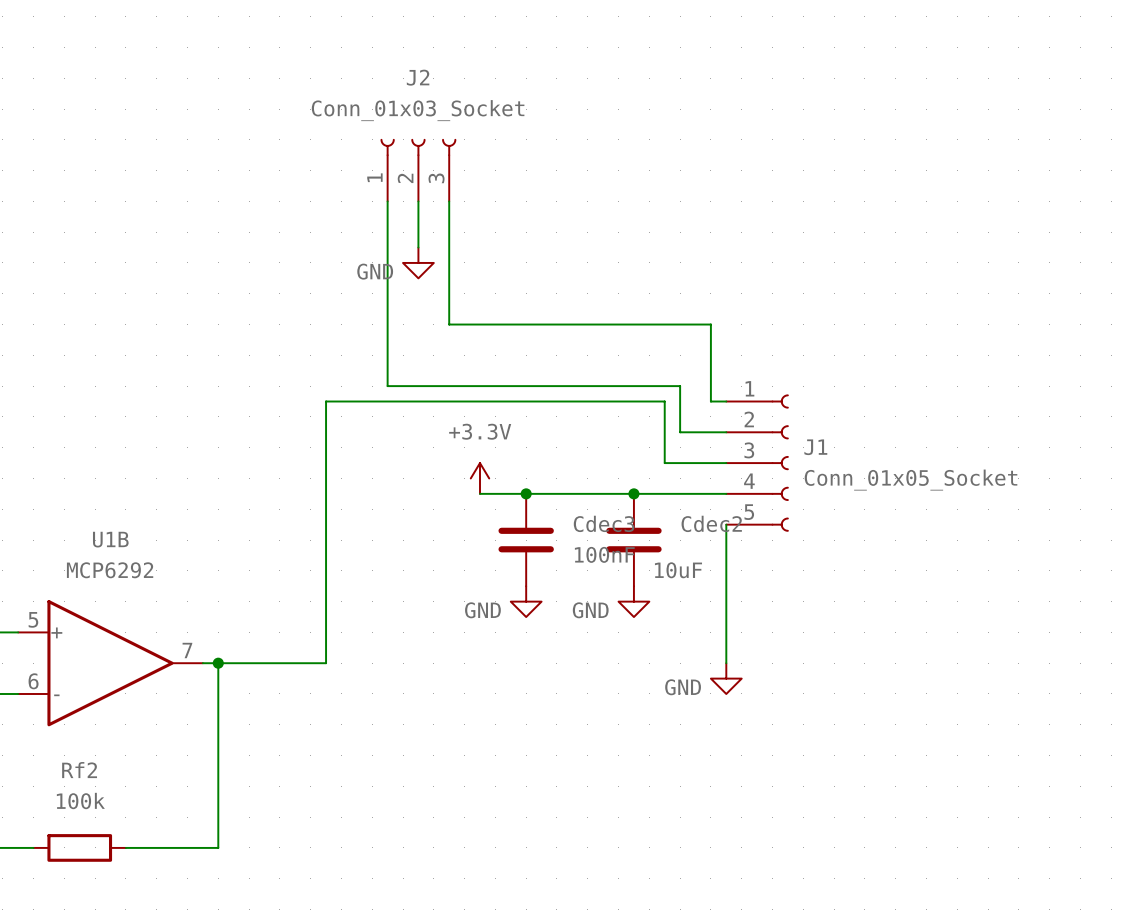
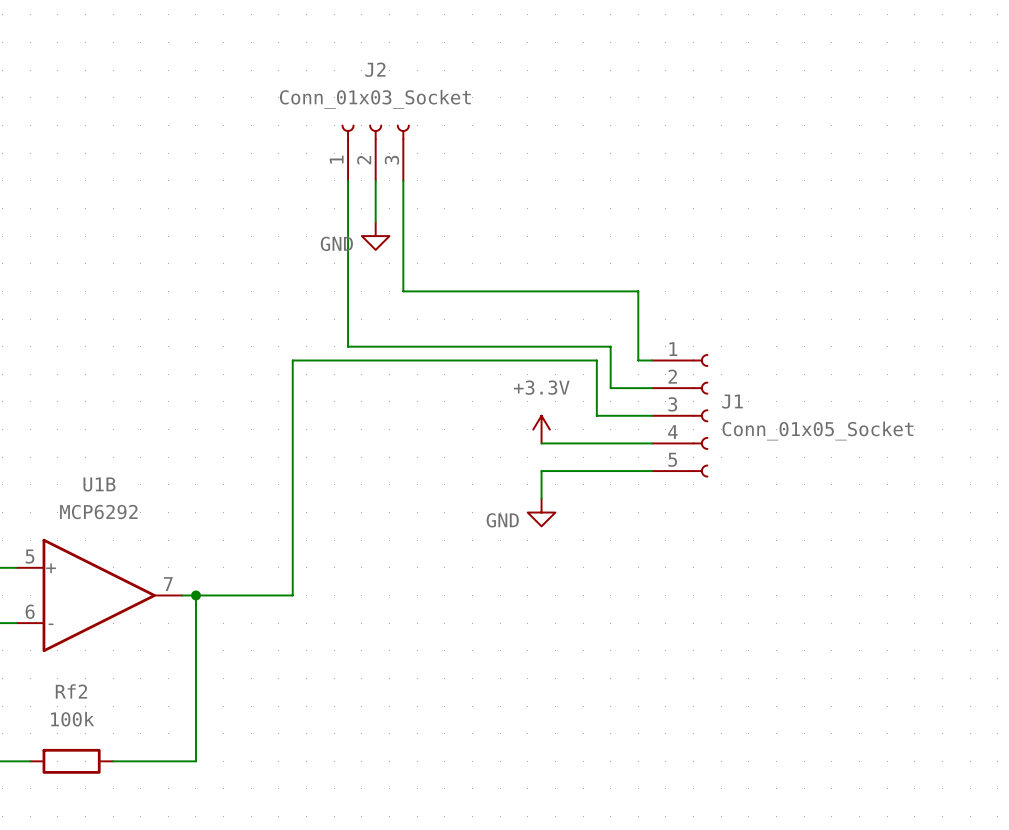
power symbol position: +3.3V (479, 478) -> +3.3V (541, 429)
wire: (479, 493) (603, 493) -> none
junction: (526, 493) -> none
junction: (633, 493) -> none
wire: (726, 524) (726, 663) -> (652, 471) (541, 471) (541, 498)
Cdec3: 100nF (526, 540) -> none
Cdec2: 10uF (633, 540) -> none
power symbol: none -> GND (541, 512)
power symbol: GND (526, 601) -> none
power symbol: GND (633, 601) -> none
power symbol: GND (726, 678) -> none

